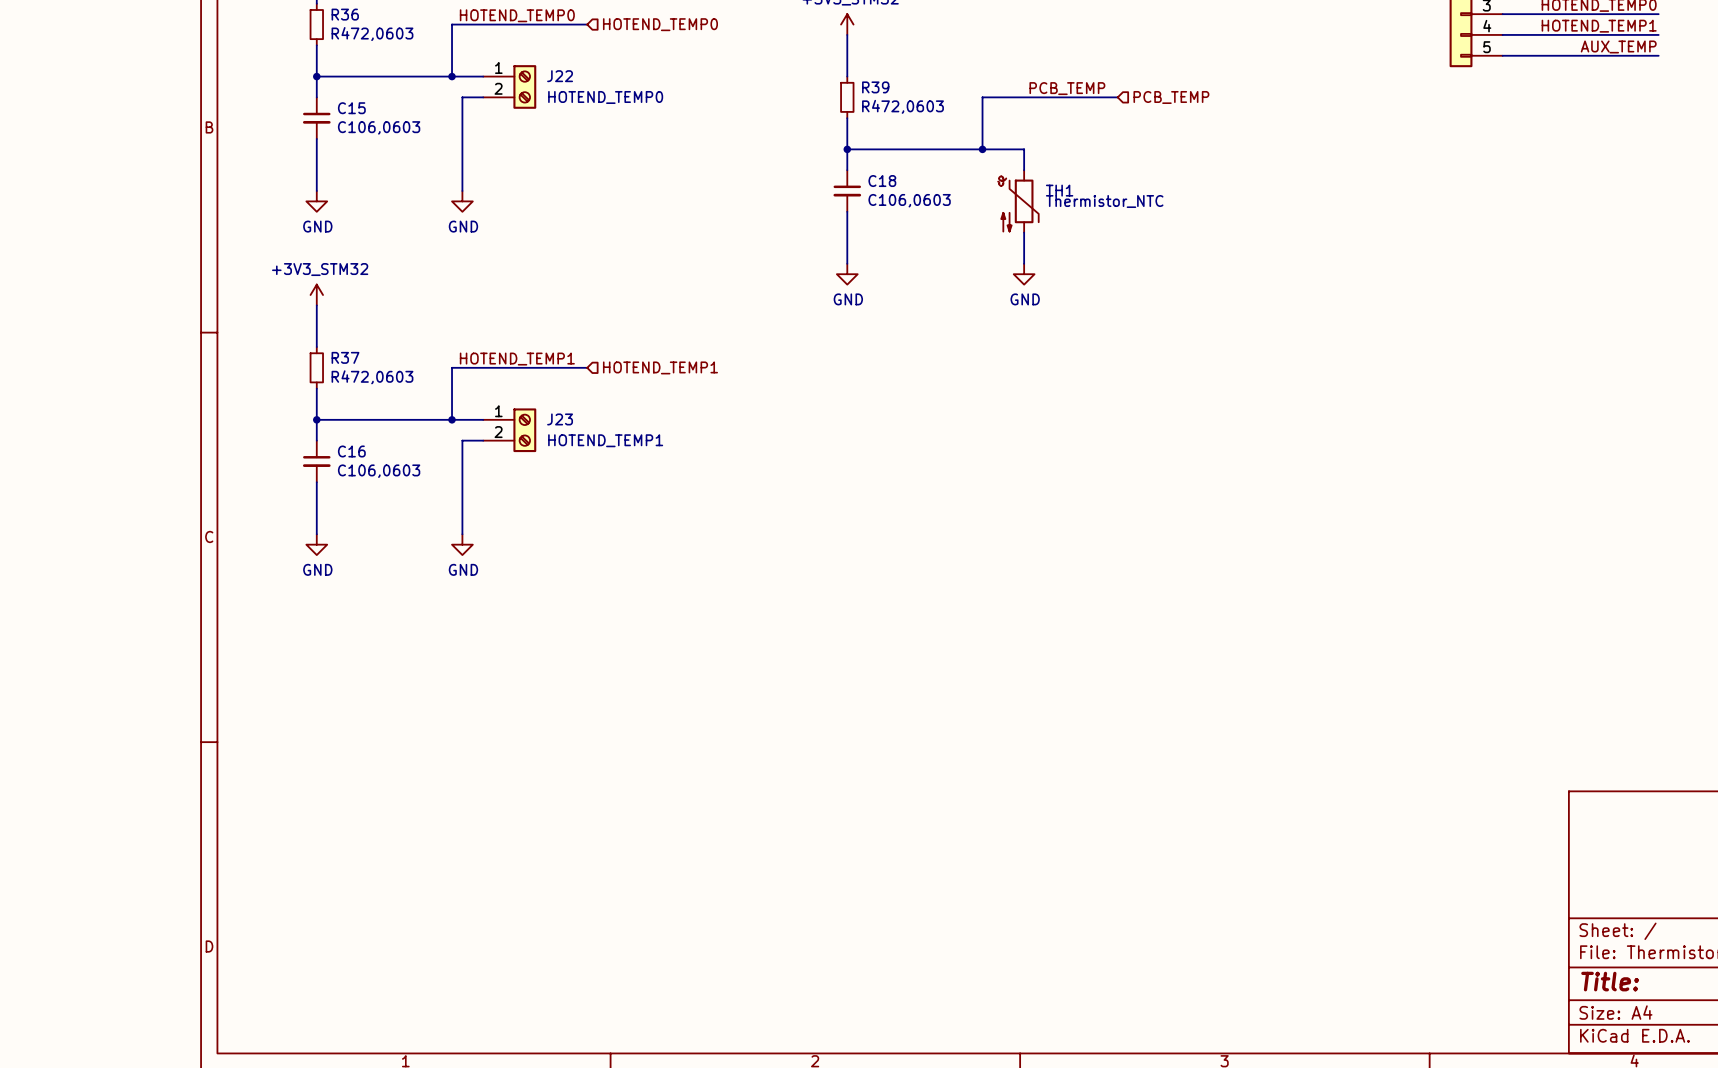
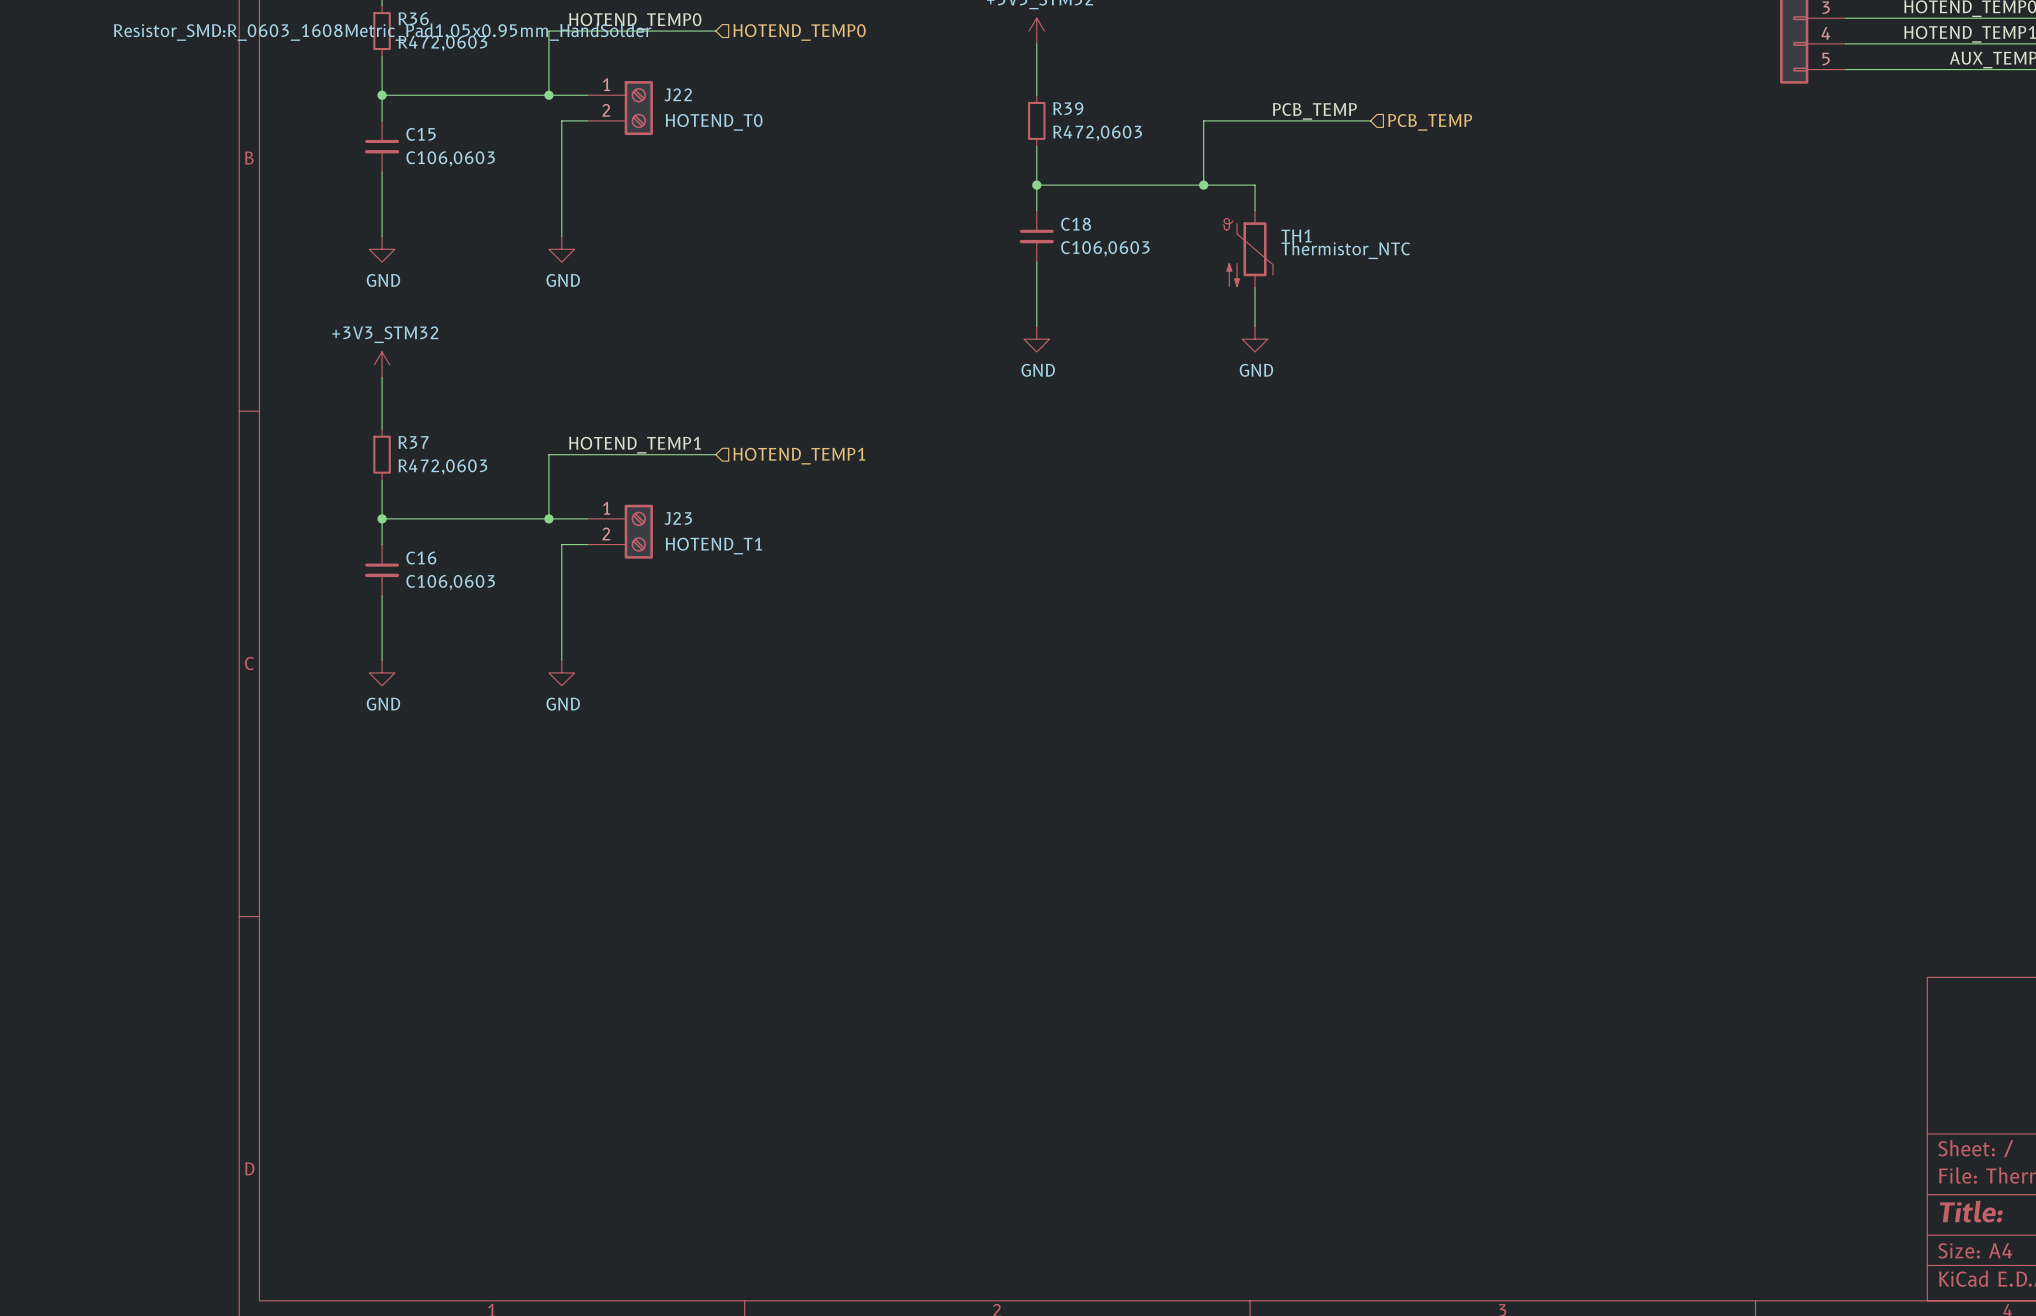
R36 text: none -> Resistor_SMD:R_0603_1608Metric_Pad1.05x0.95mm_HandSolder (382, 32)
J22 value: HOTEND_TEMP0 (605, 97) -> HOTEND_T0 (714, 122)
J23 value: HOTEND_TEMP1 (605, 440) -> HOTEND_T1 (713, 546)

